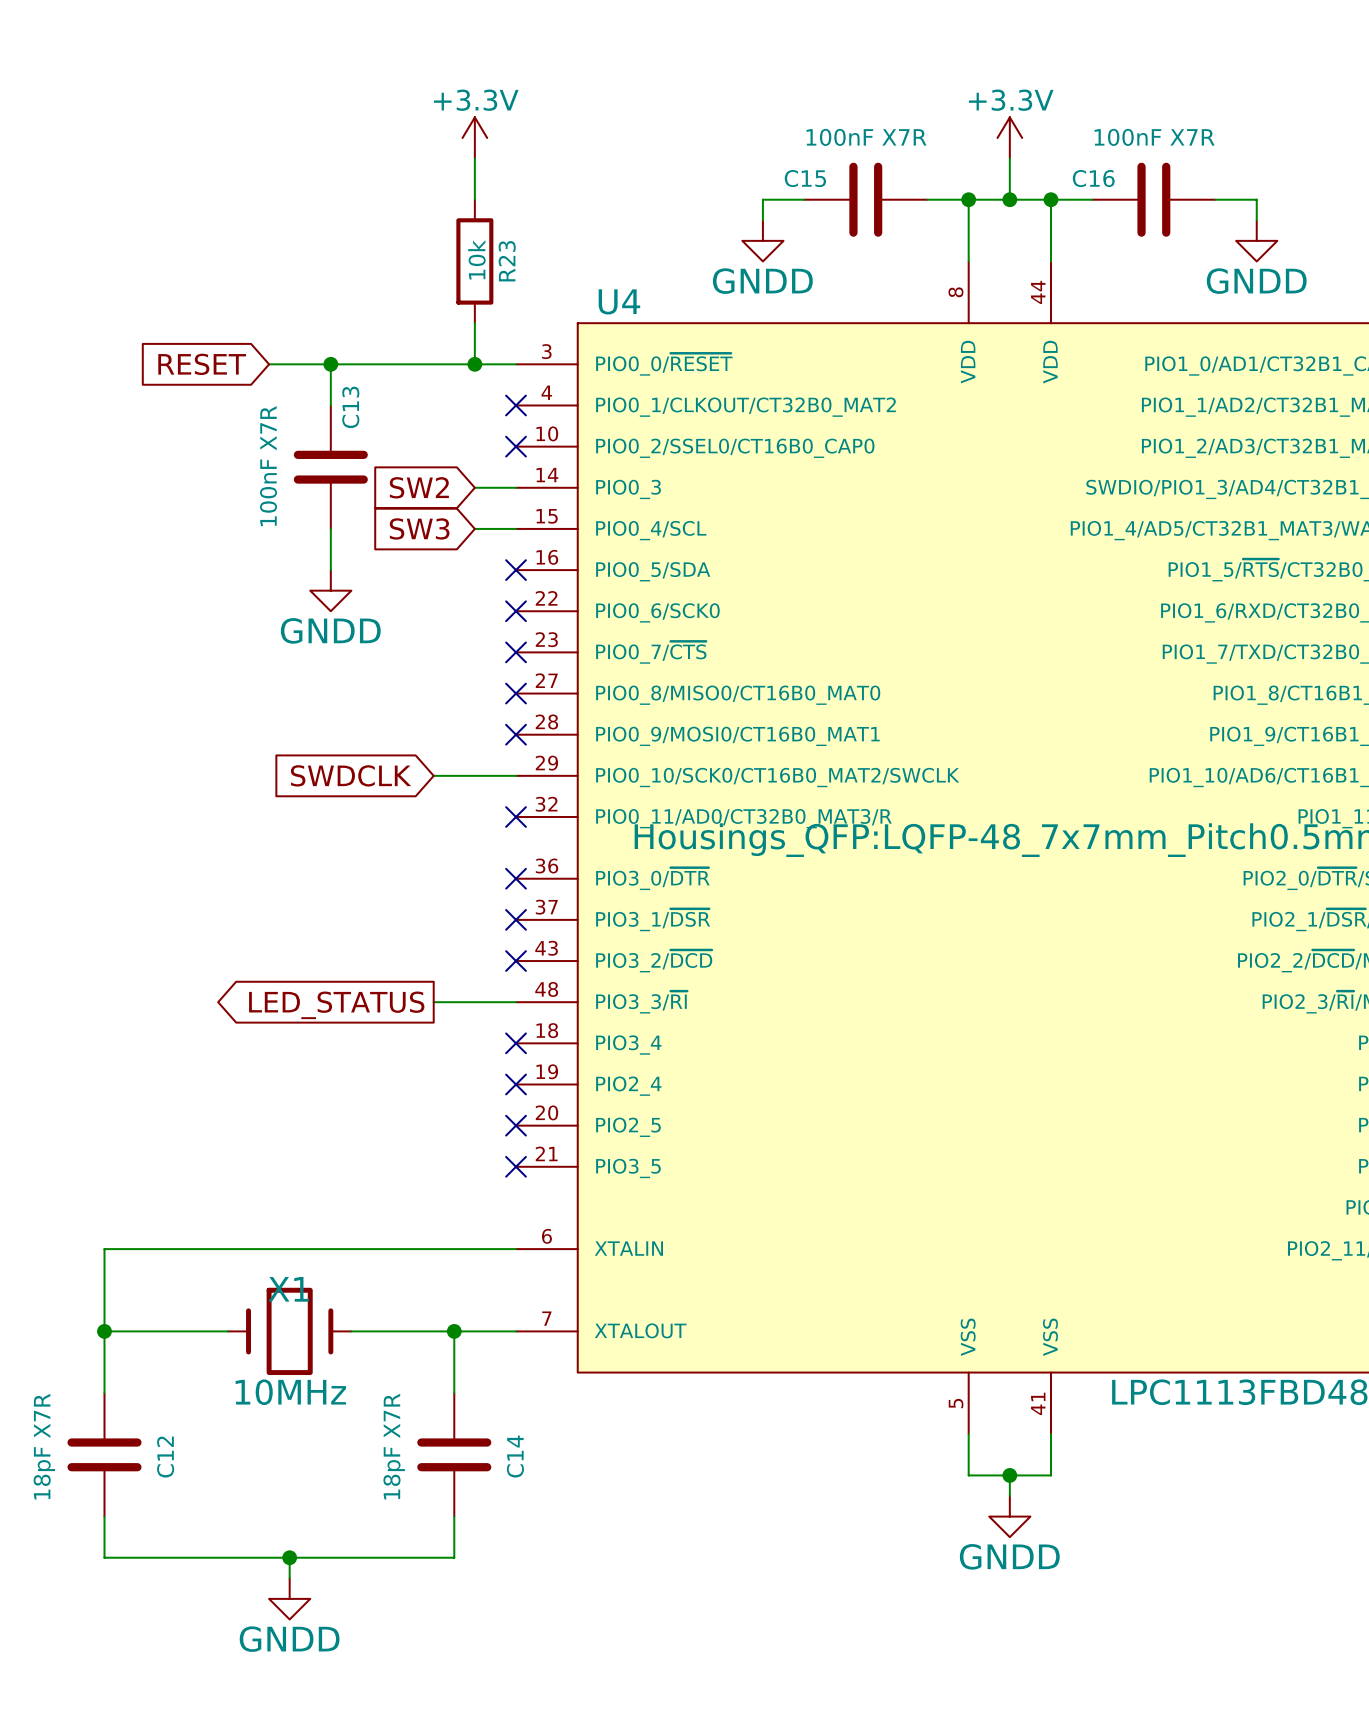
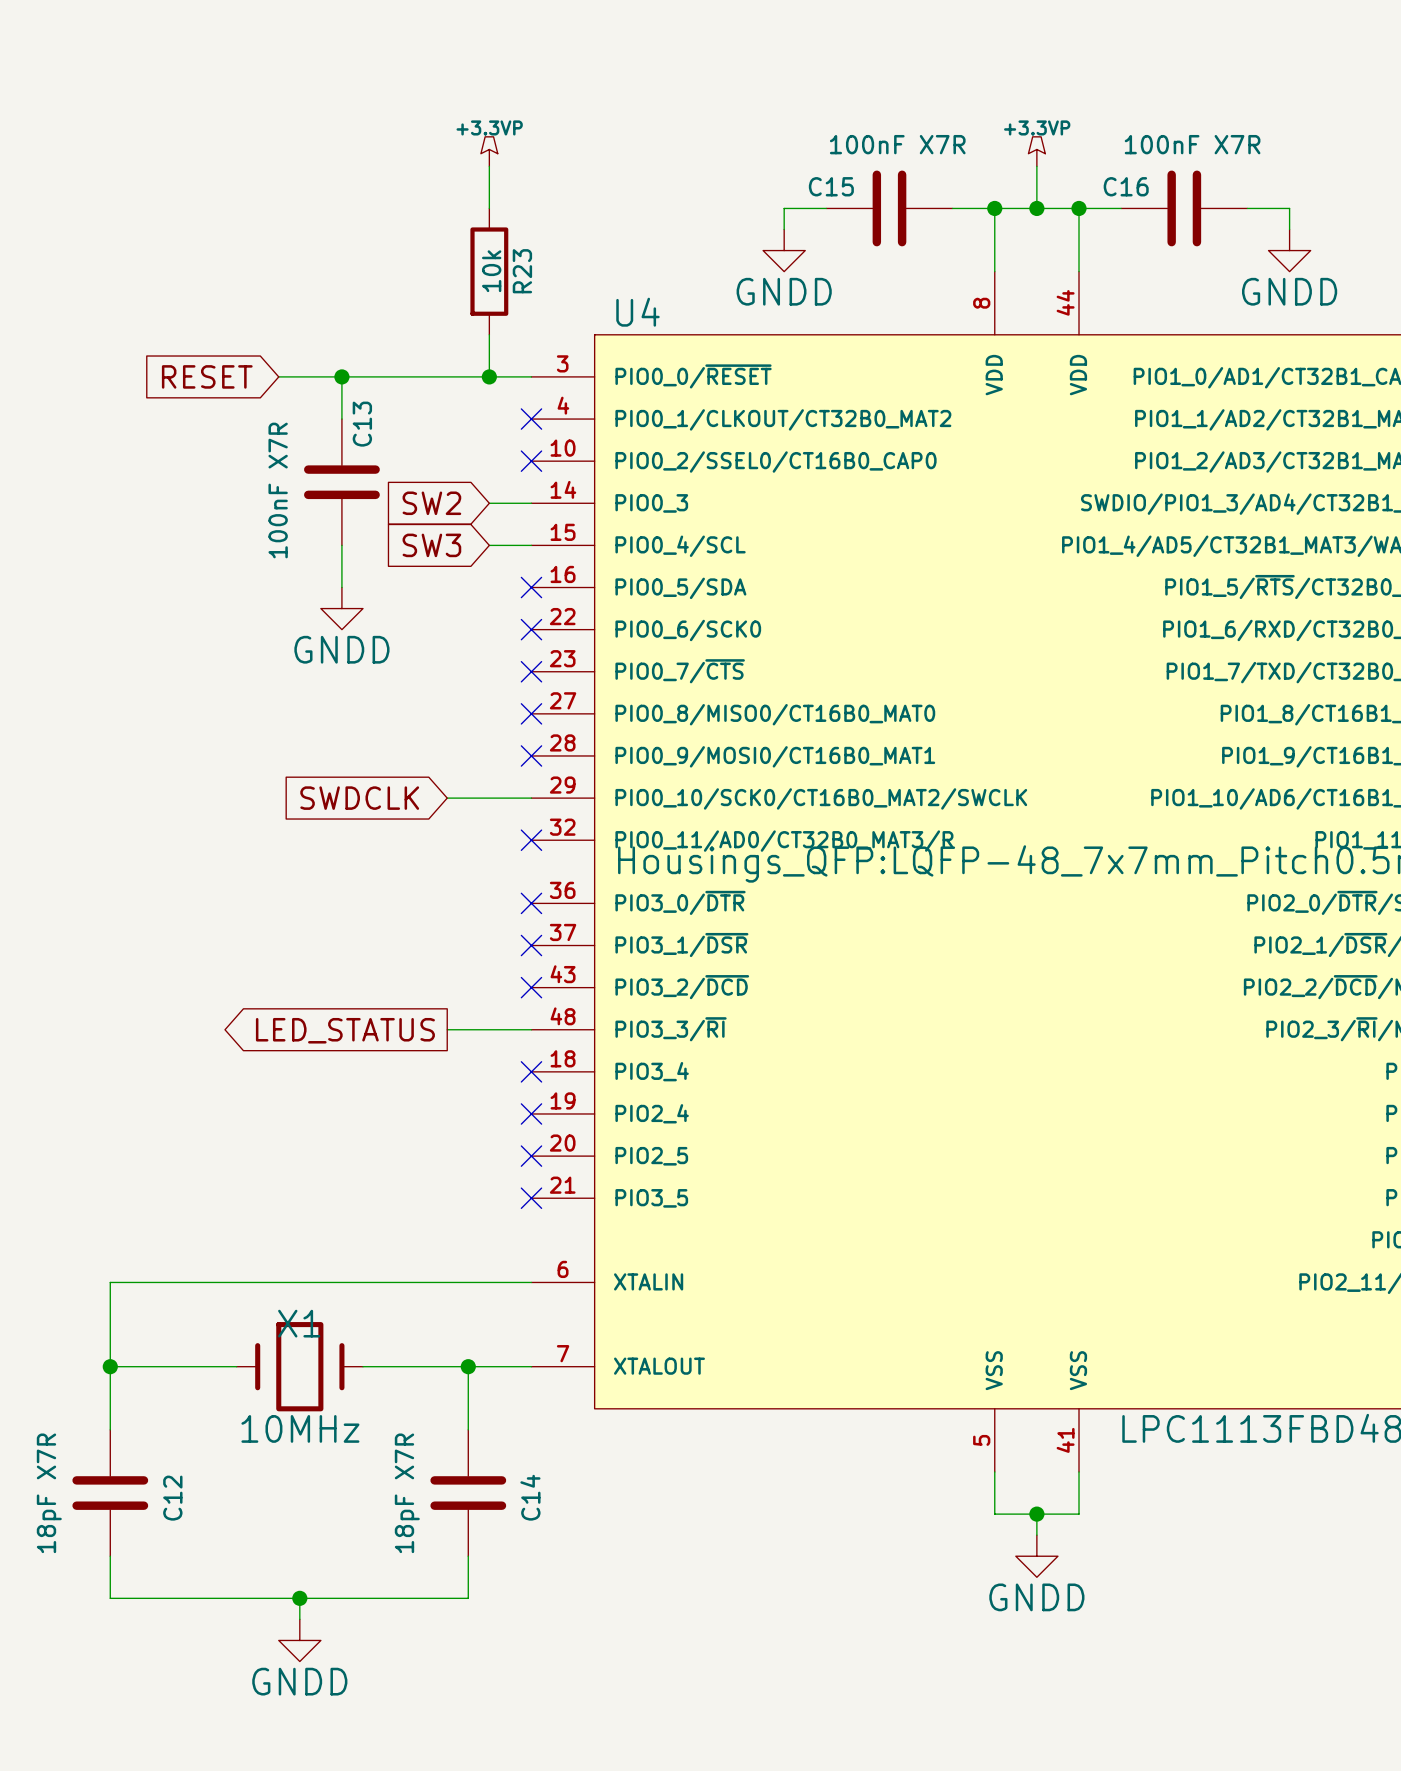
power symbol: +3.3V (474, 137) -> +3.3VP (489, 151)
power symbol: +3.3V (1009, 137) -> +3.3VP (1036, 151)

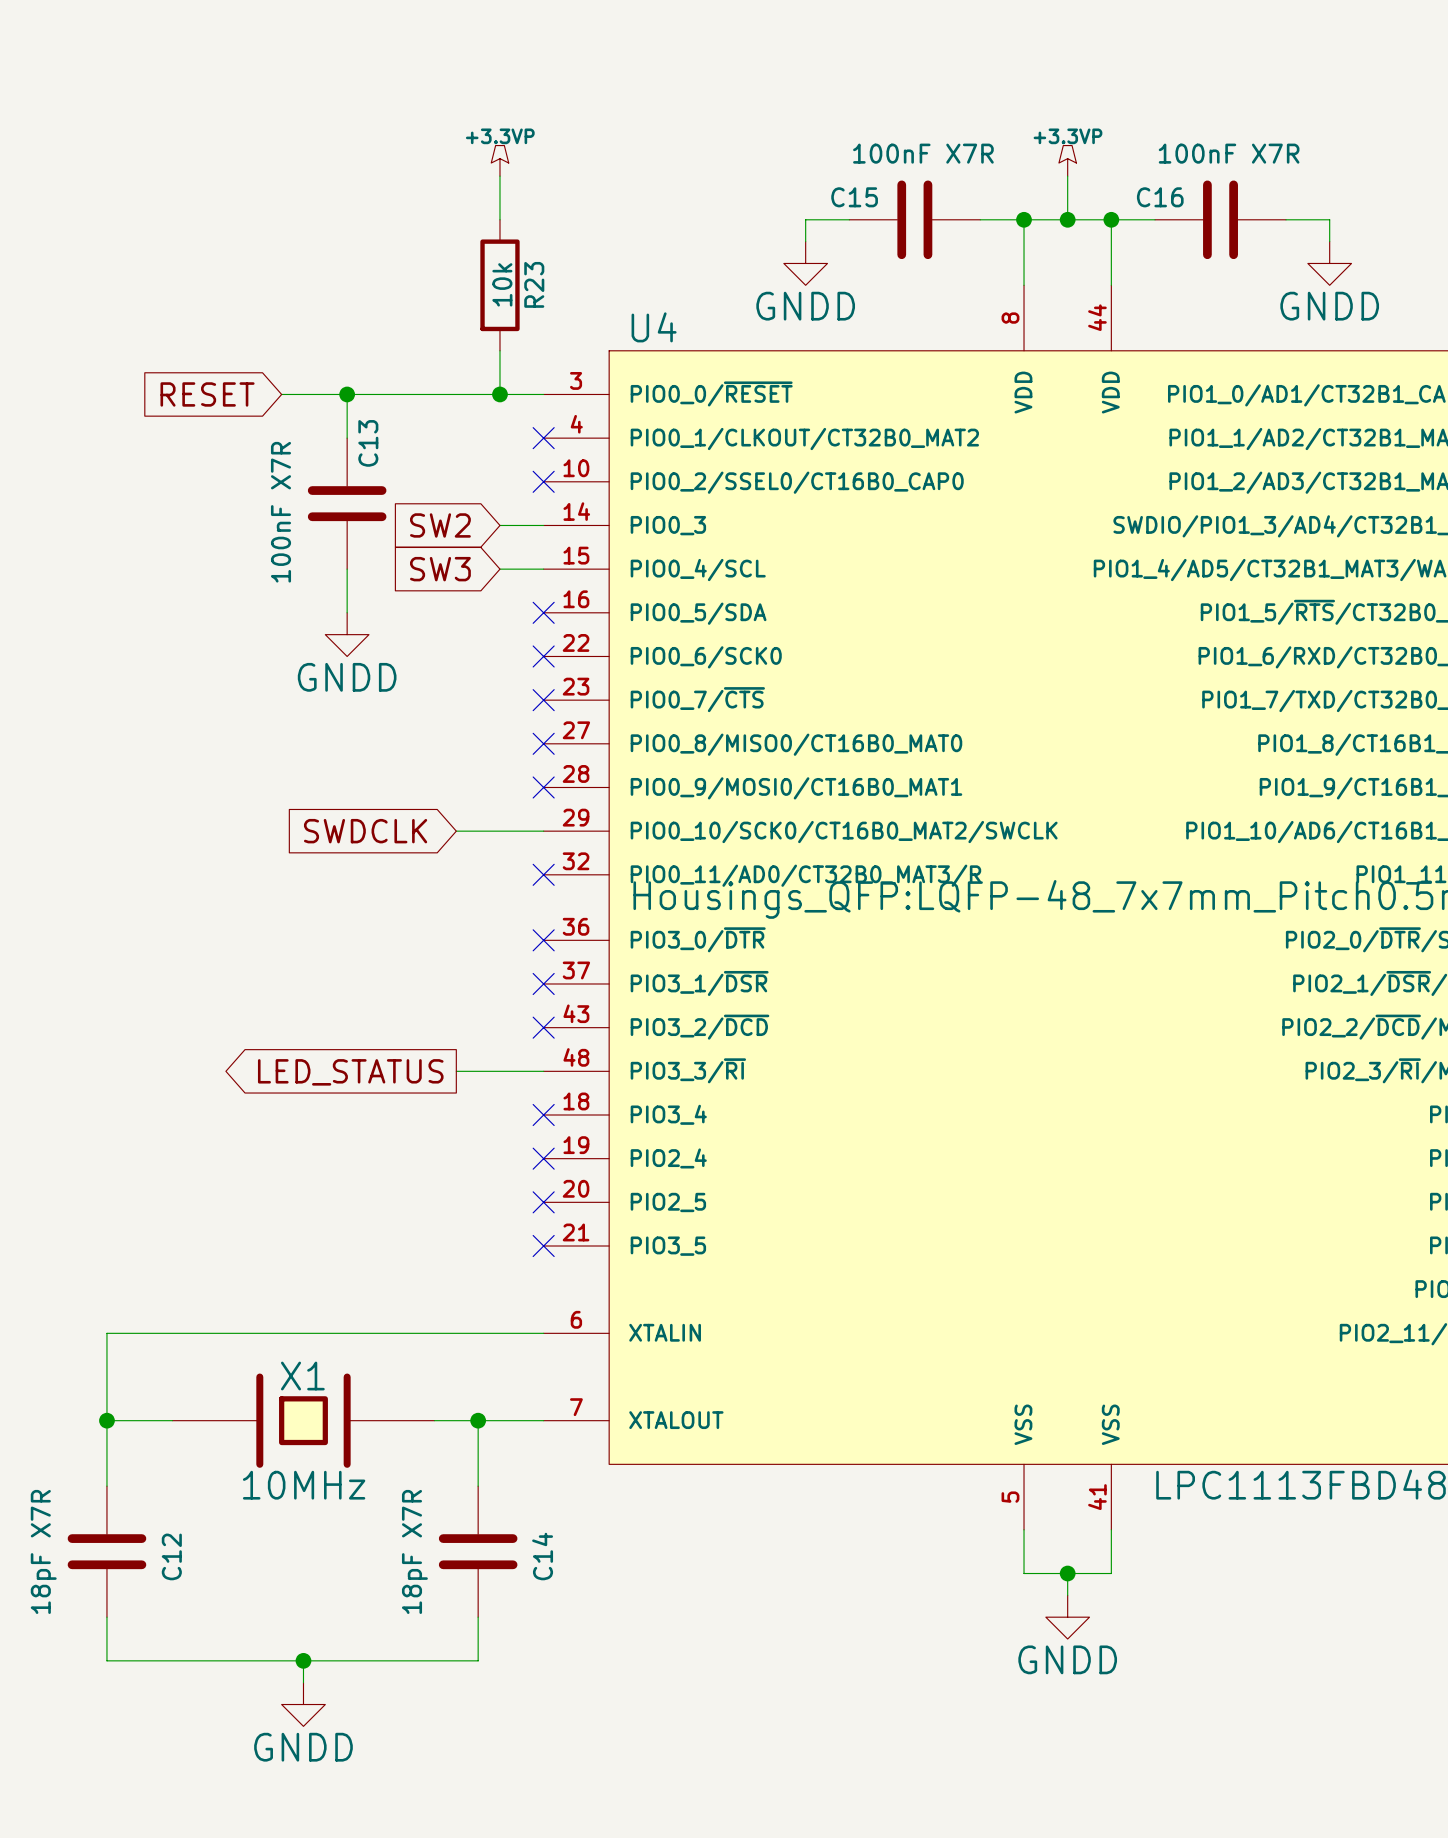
X1 symbol: [236, 1322, 363, 1412] -> [172, 1373, 435, 1468]

